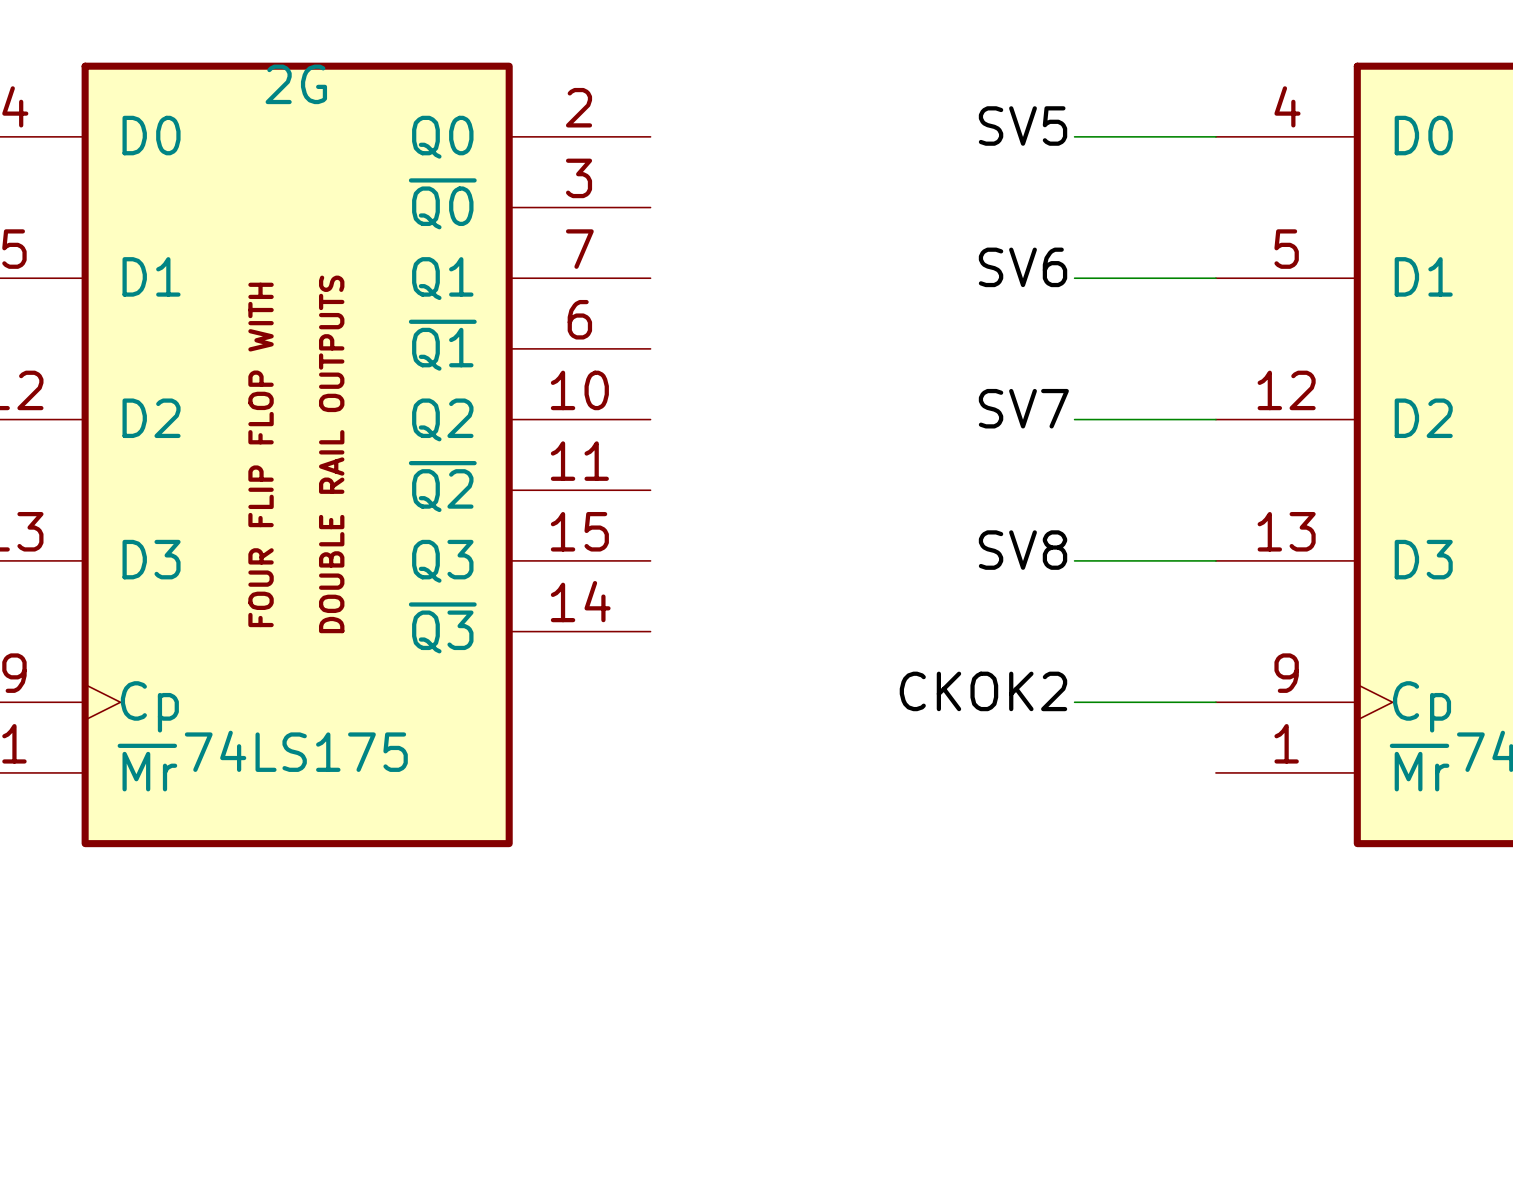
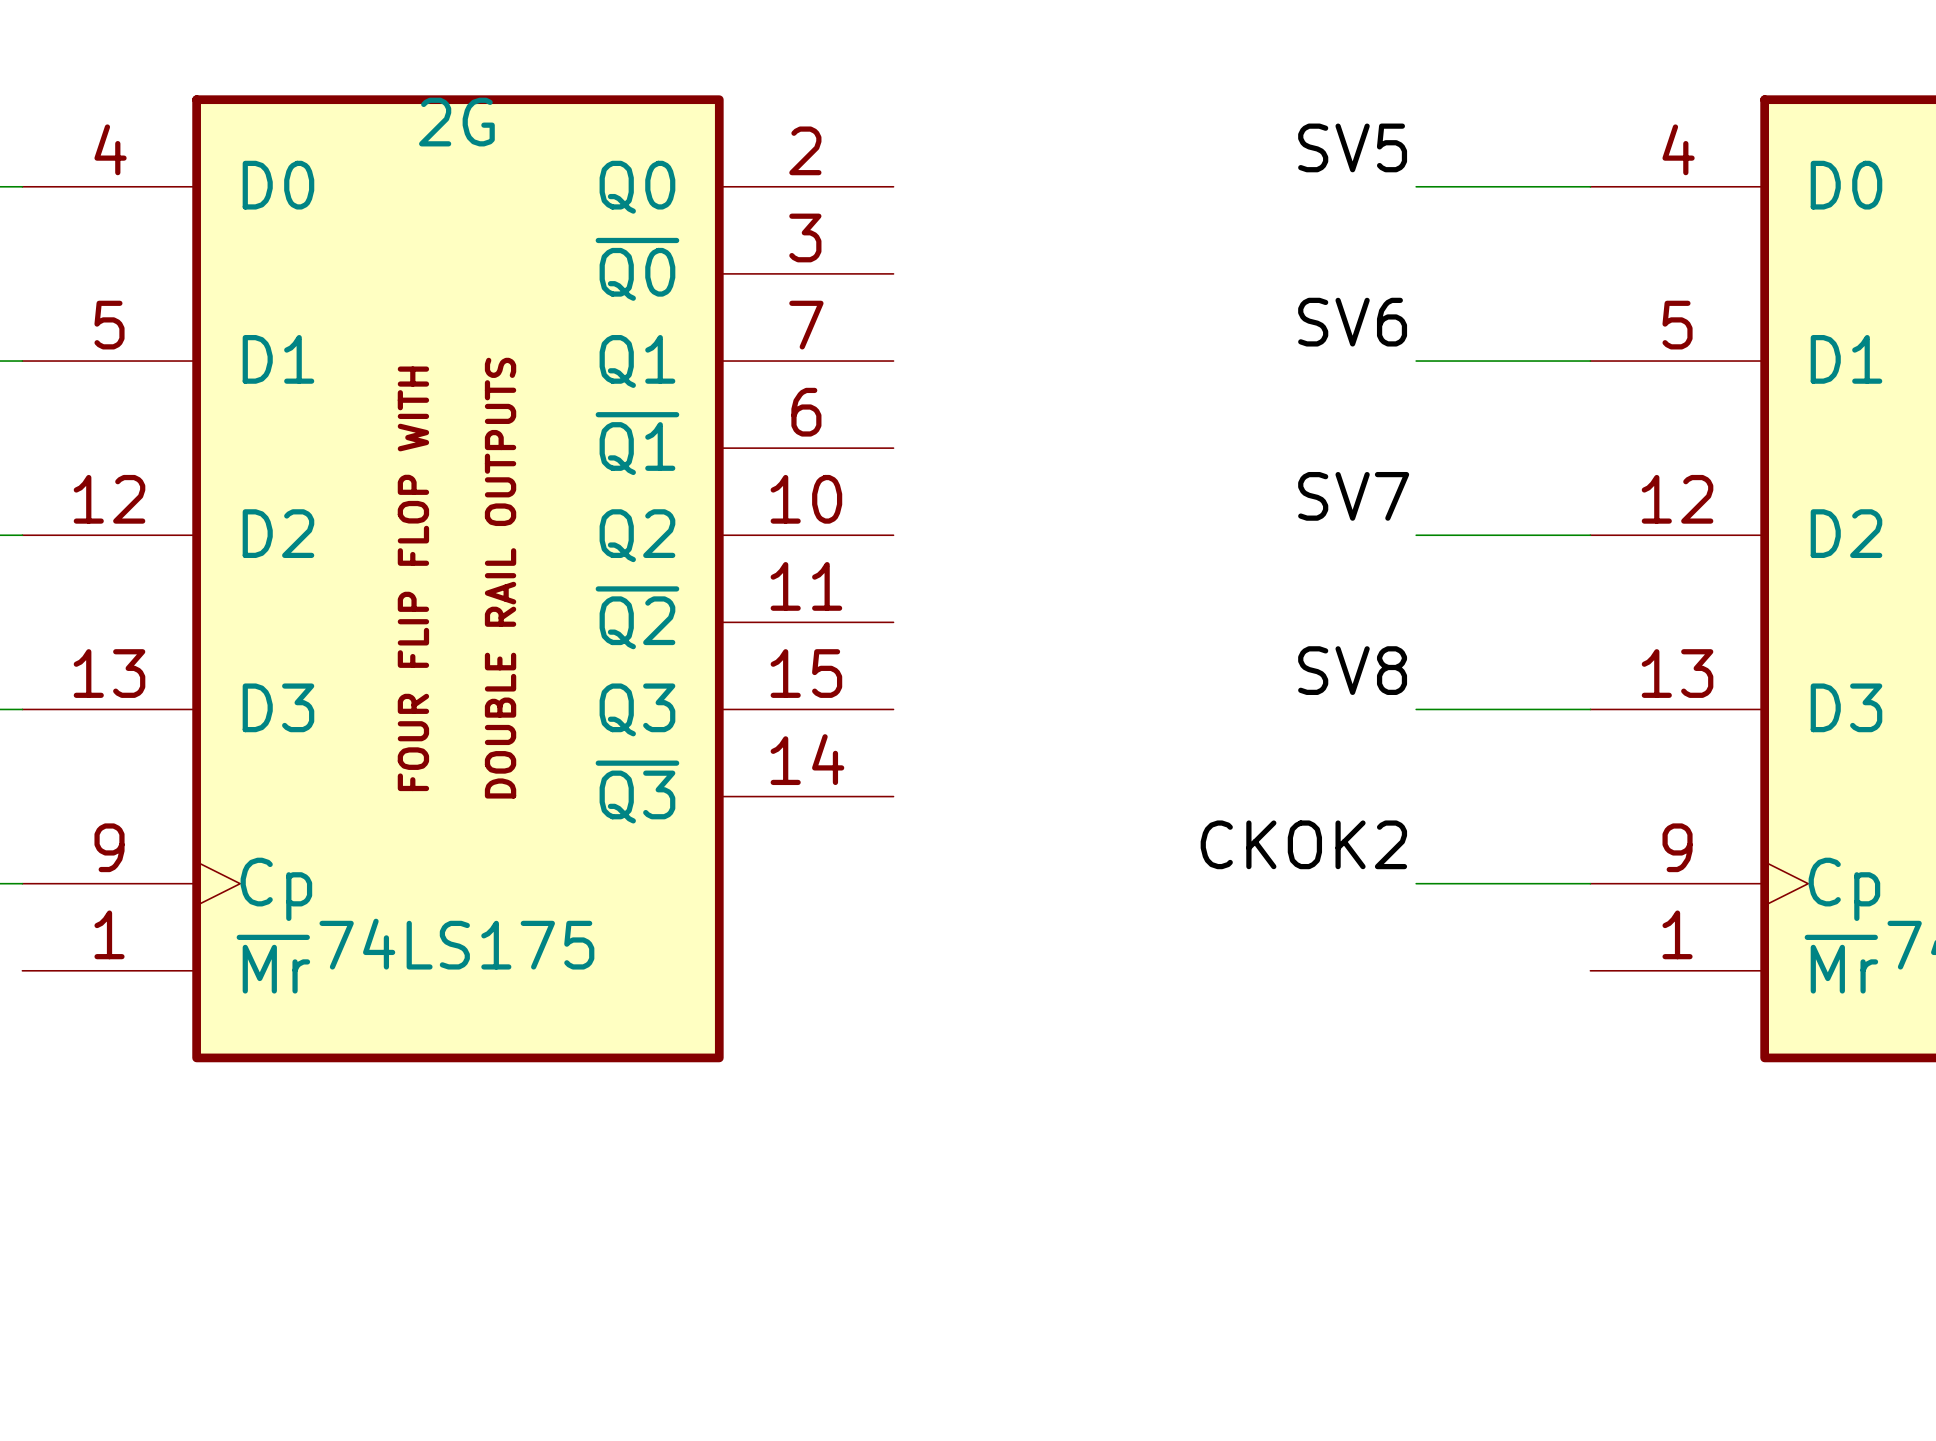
label position: SV5 (1023, 126) -> SV5 (1352, 147)
label position: SV6 (1023, 267) -> SV6 (1352, 322)
label position: SV7 (1023, 408) -> SV7 (1353, 496)
label position: SV8 (1023, 550) -> SV8 (1352, 670)
label position: CKOK2 (983, 691) -> CKOK2 (1303, 844)

